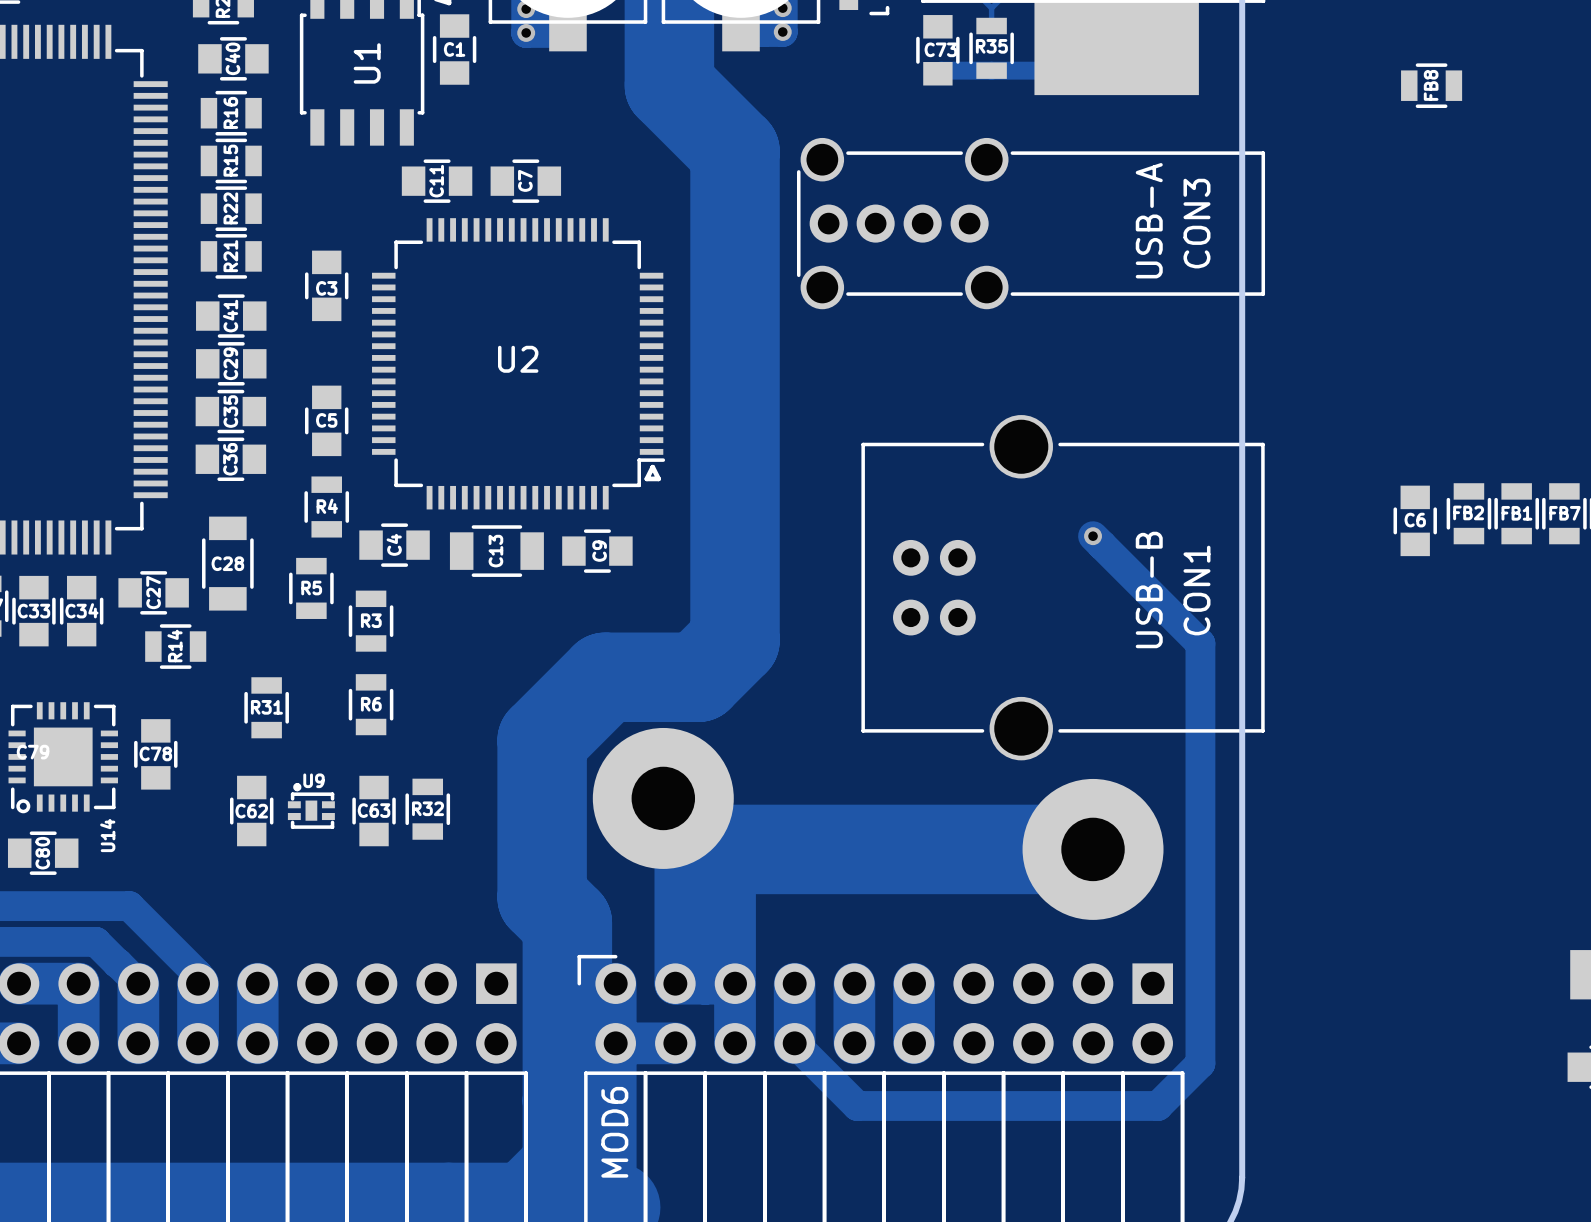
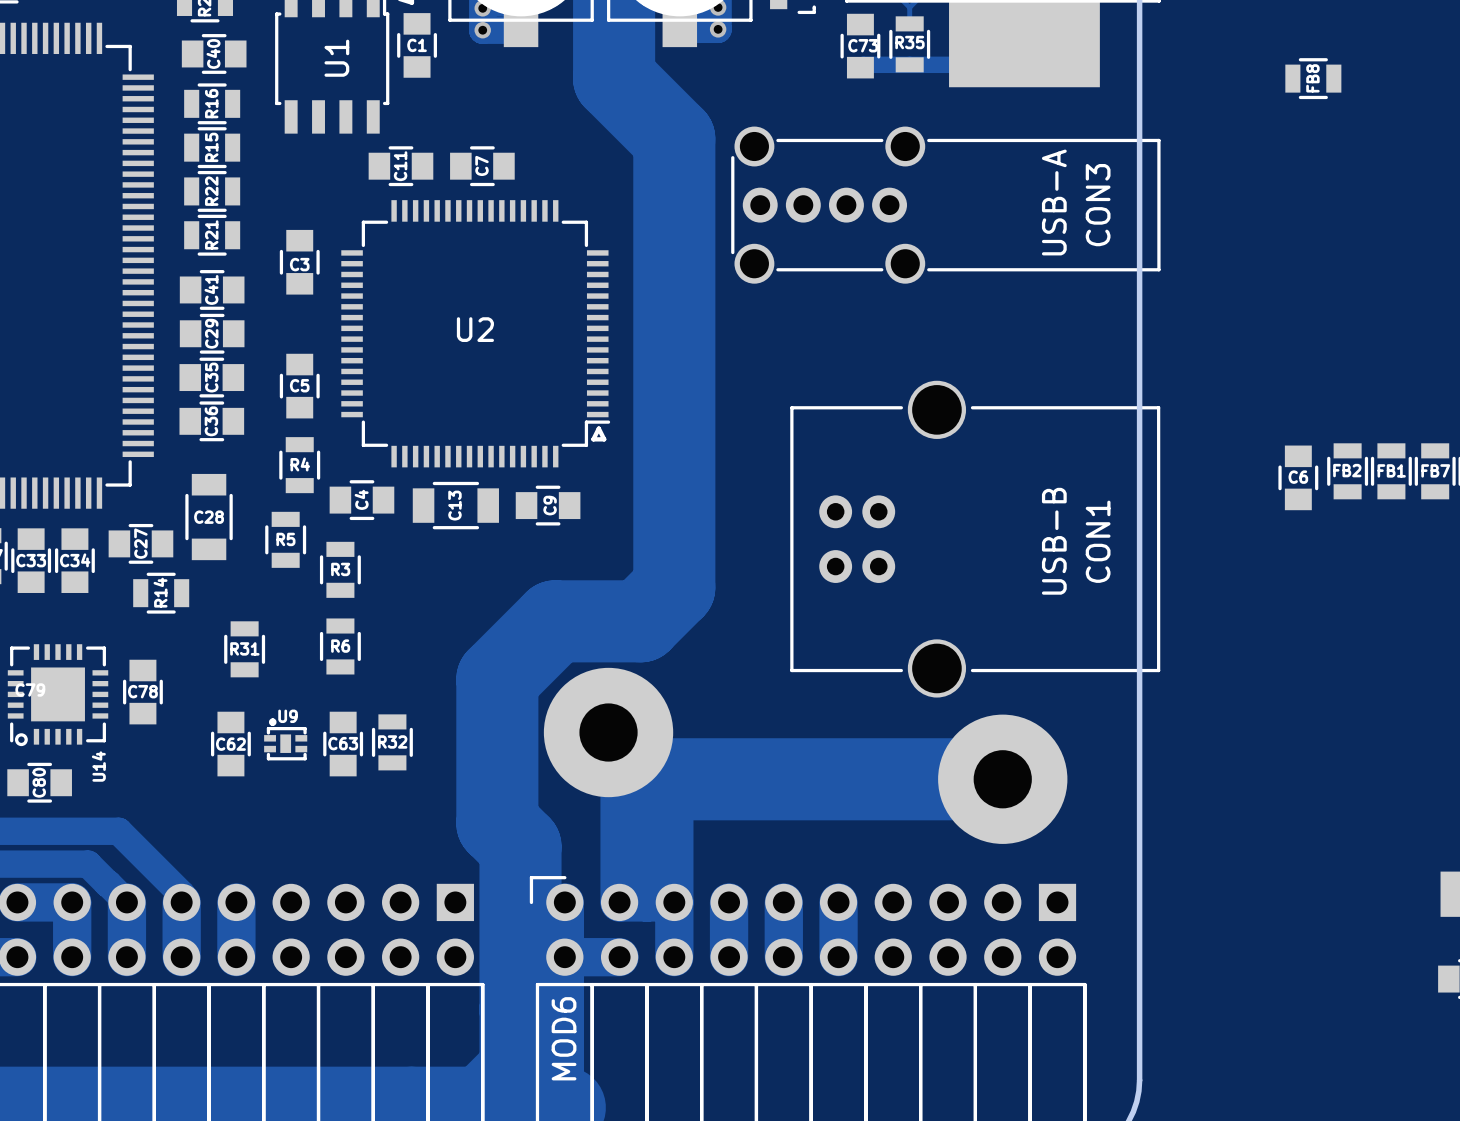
track: (1093, 536) (1200, 643) (1200, 1063) (1157, 1105) (857, 1105) (794, 1043) -> none
via: (1093, 536) -> none

